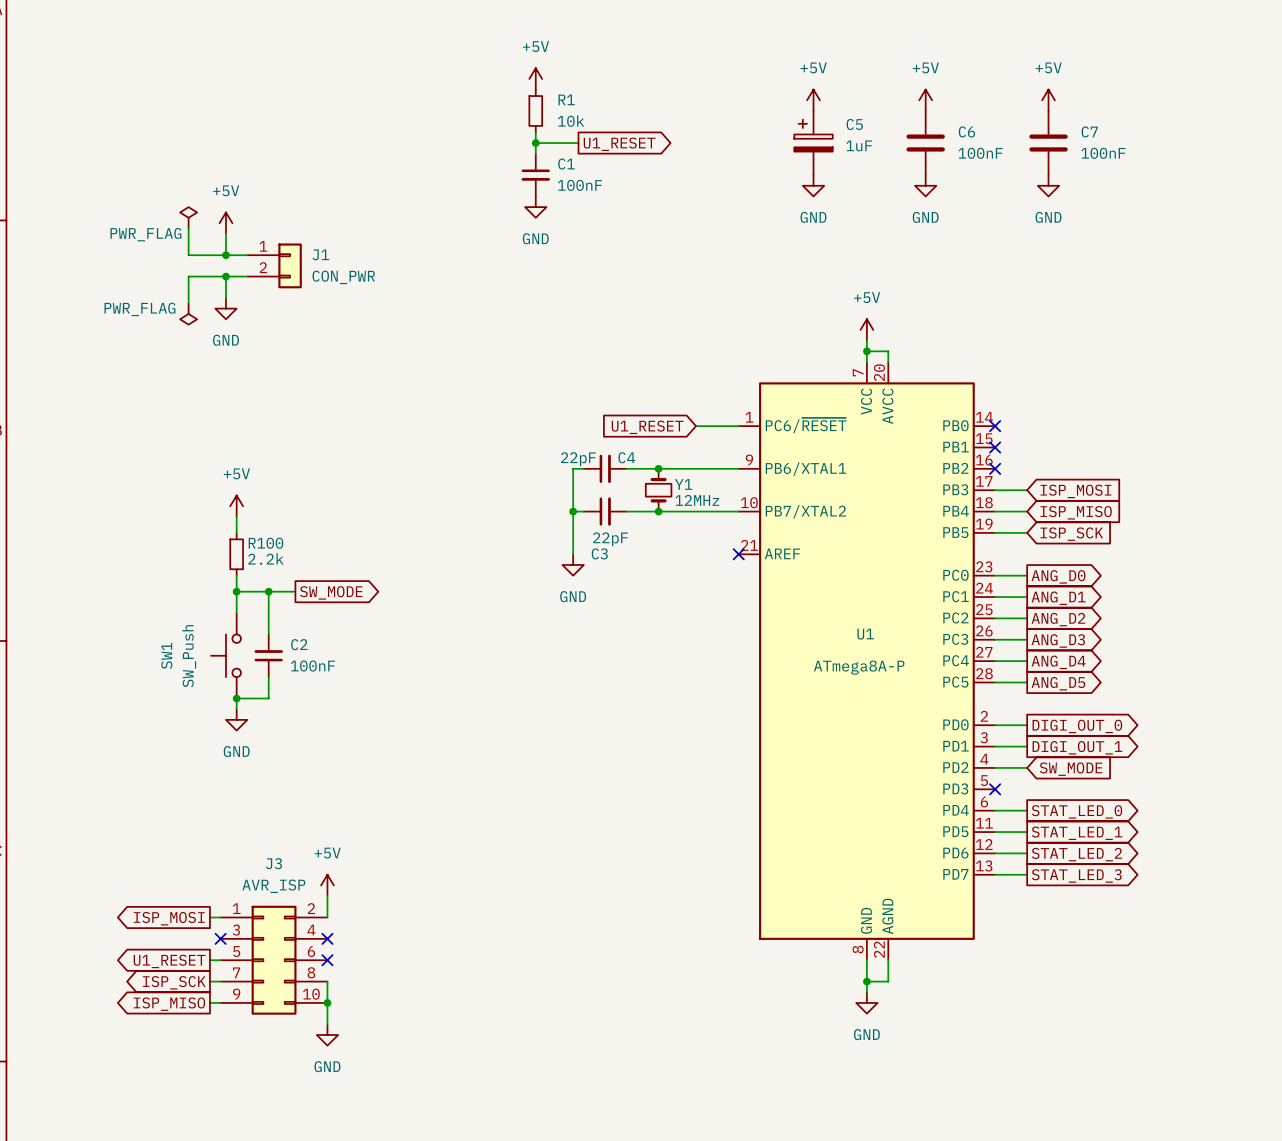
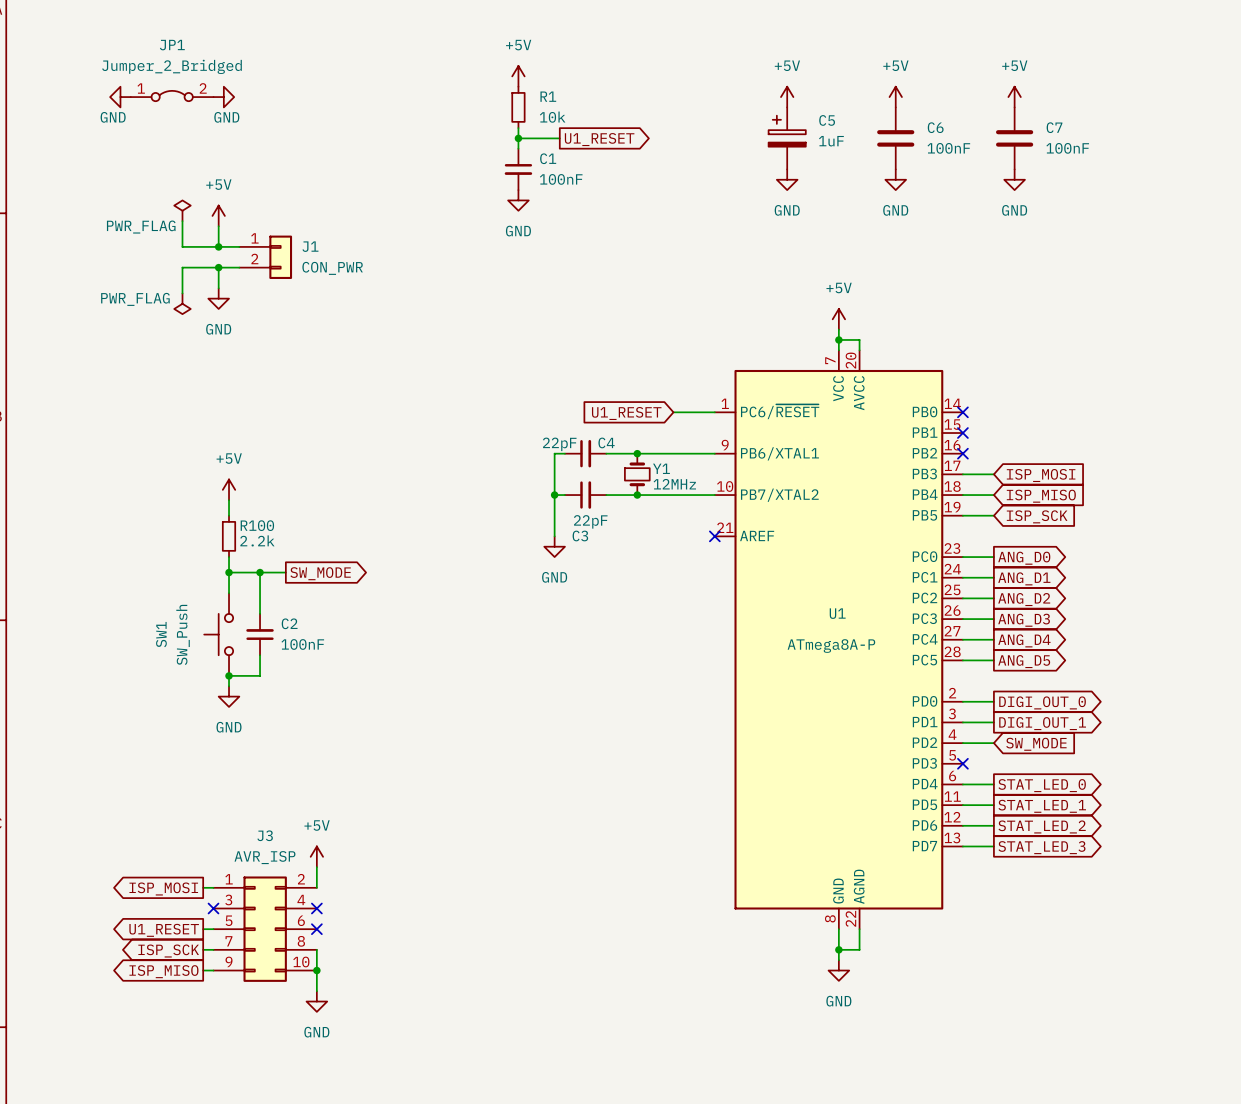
JP1: none -> Jumper_2_Bridged (172, 96)
power symbol: none -> GND (120, 97)
power symbol: none -> GND (223, 97)

